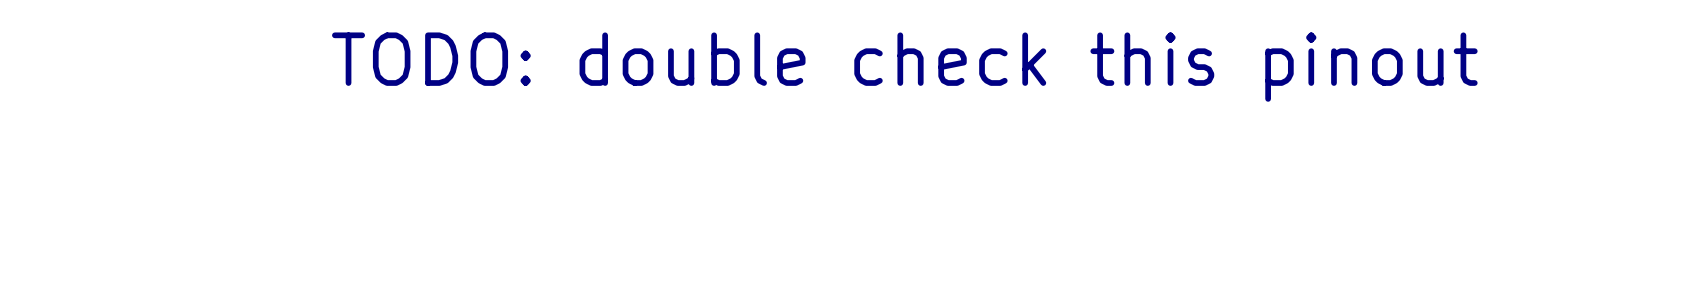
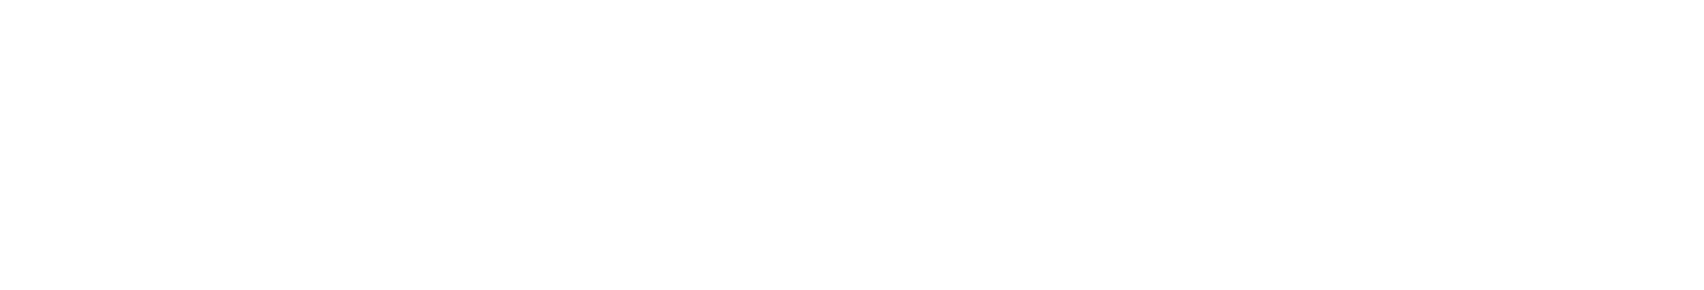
text: TODO: double check this pinout (904, 67) -> none

